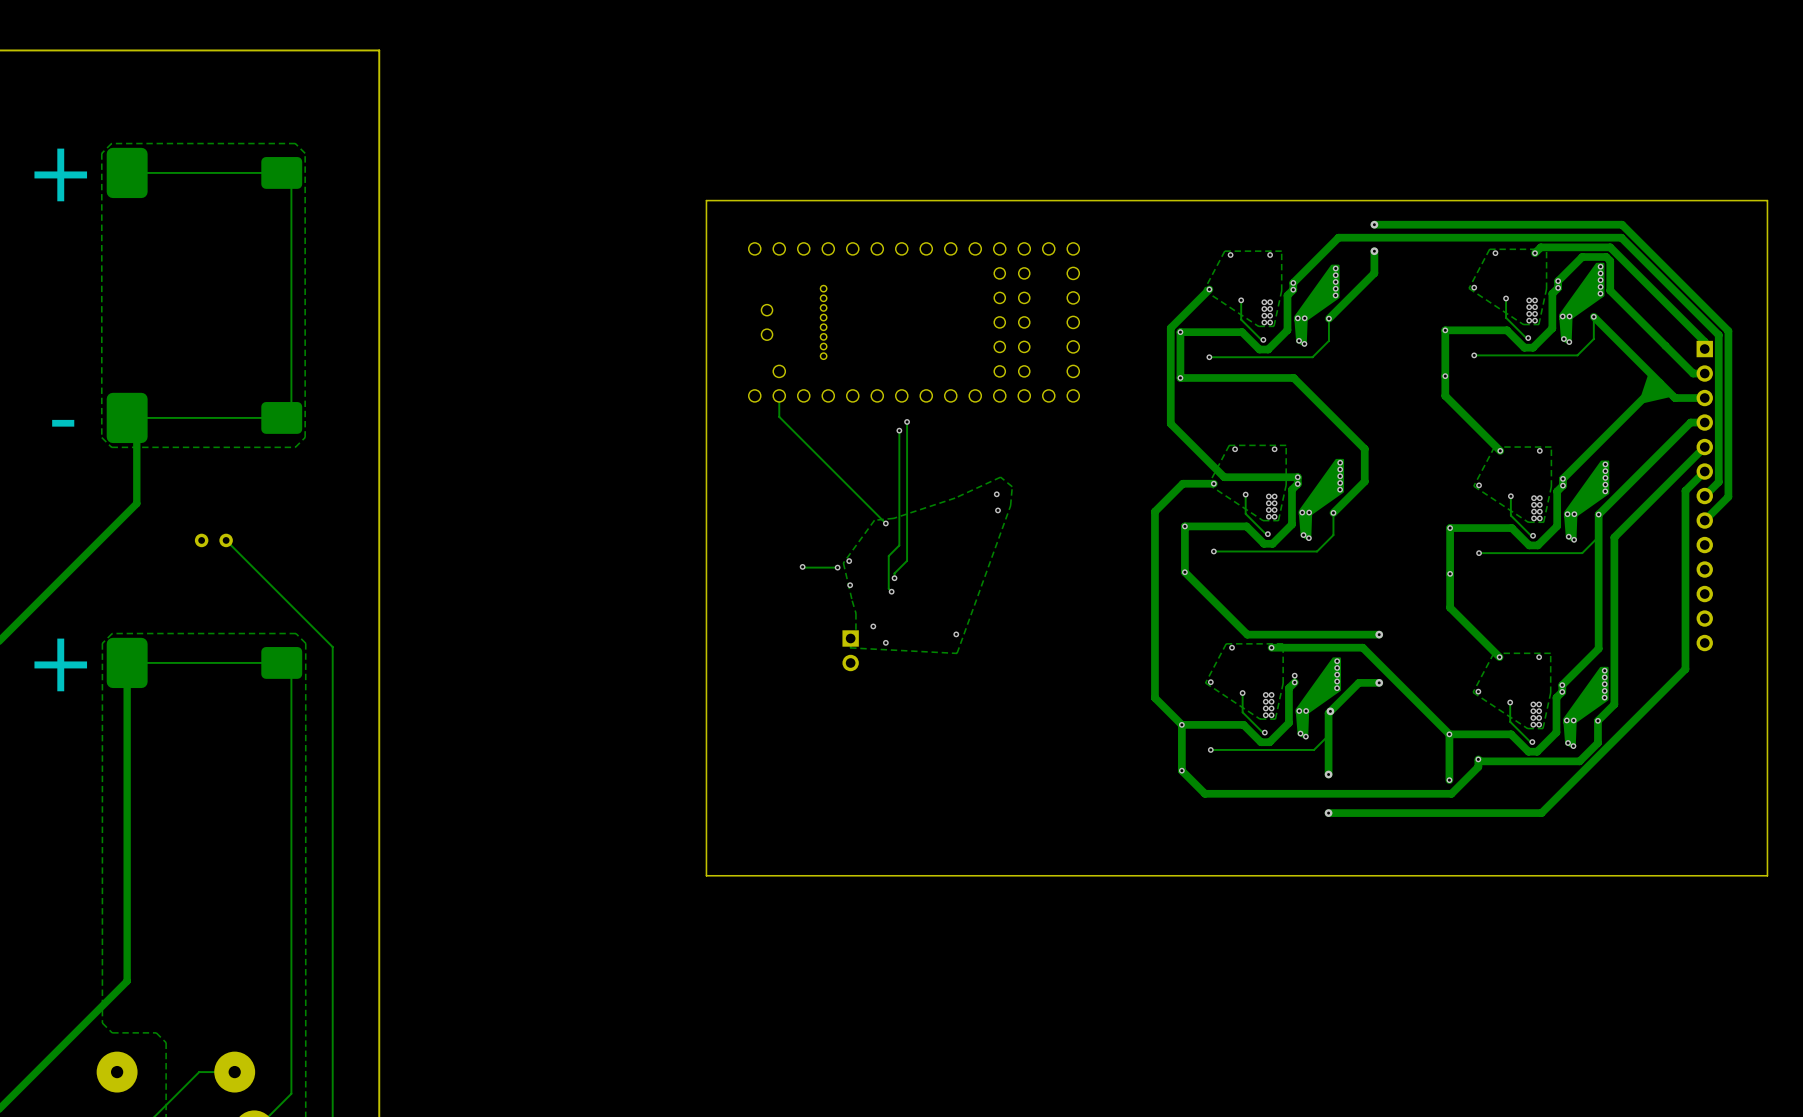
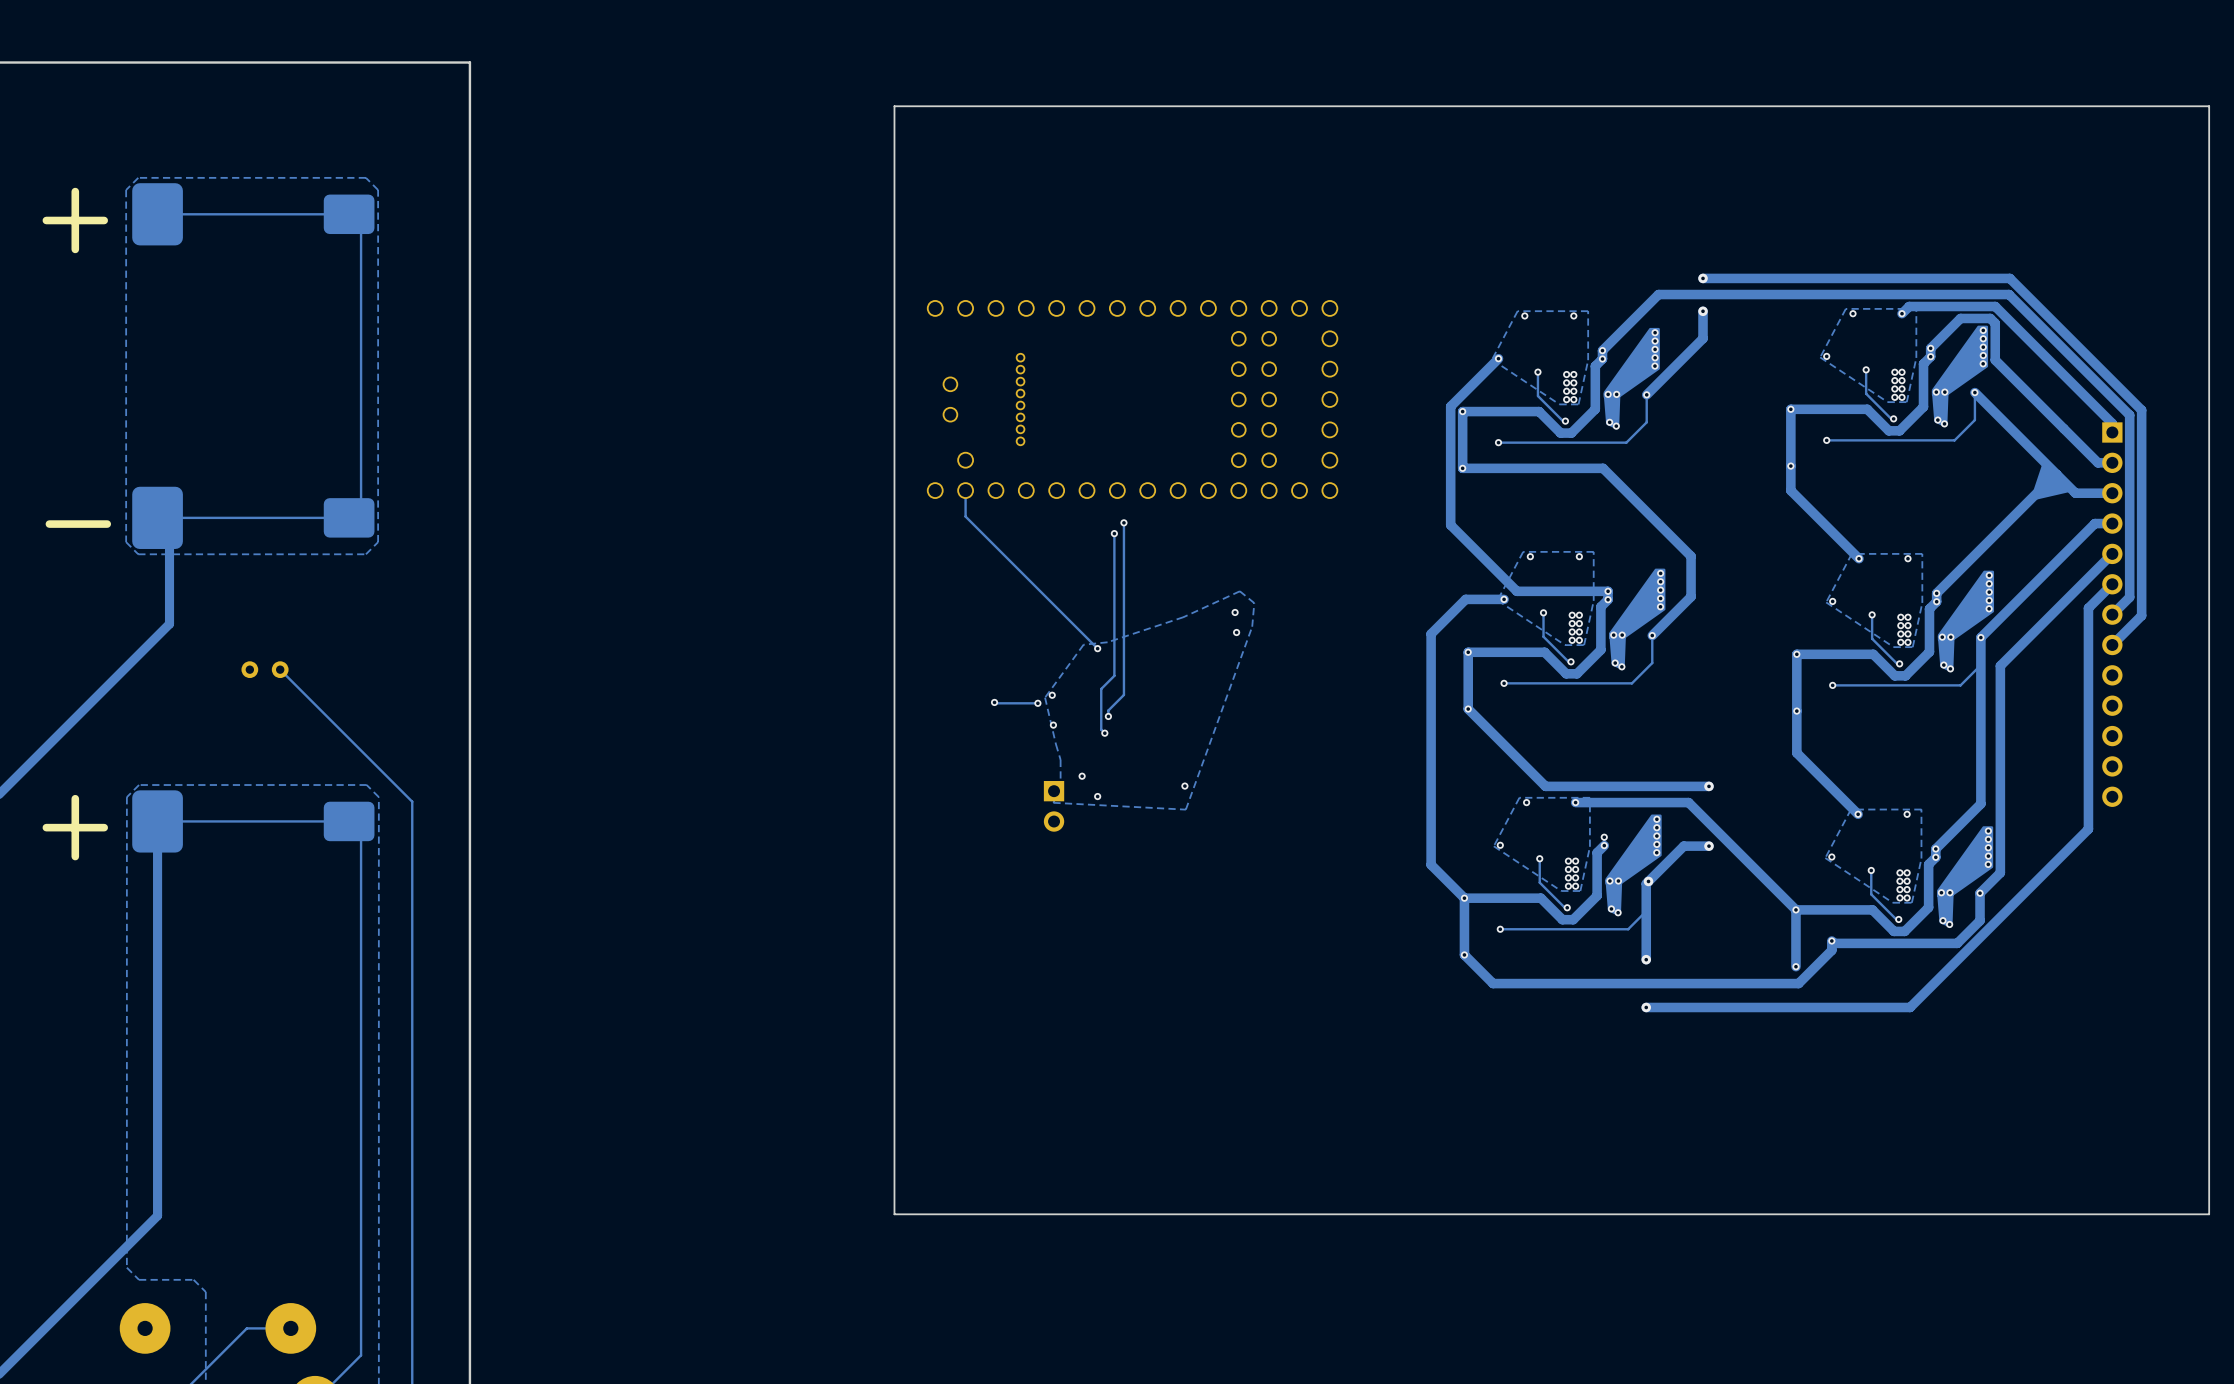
board edge: (1767, 200) (706, 200) (706, 875) (1767, 875) (1767, 200) -> (2209, 106) (2209, 1214) (894, 1214) (894, 106) (2209, 106)

